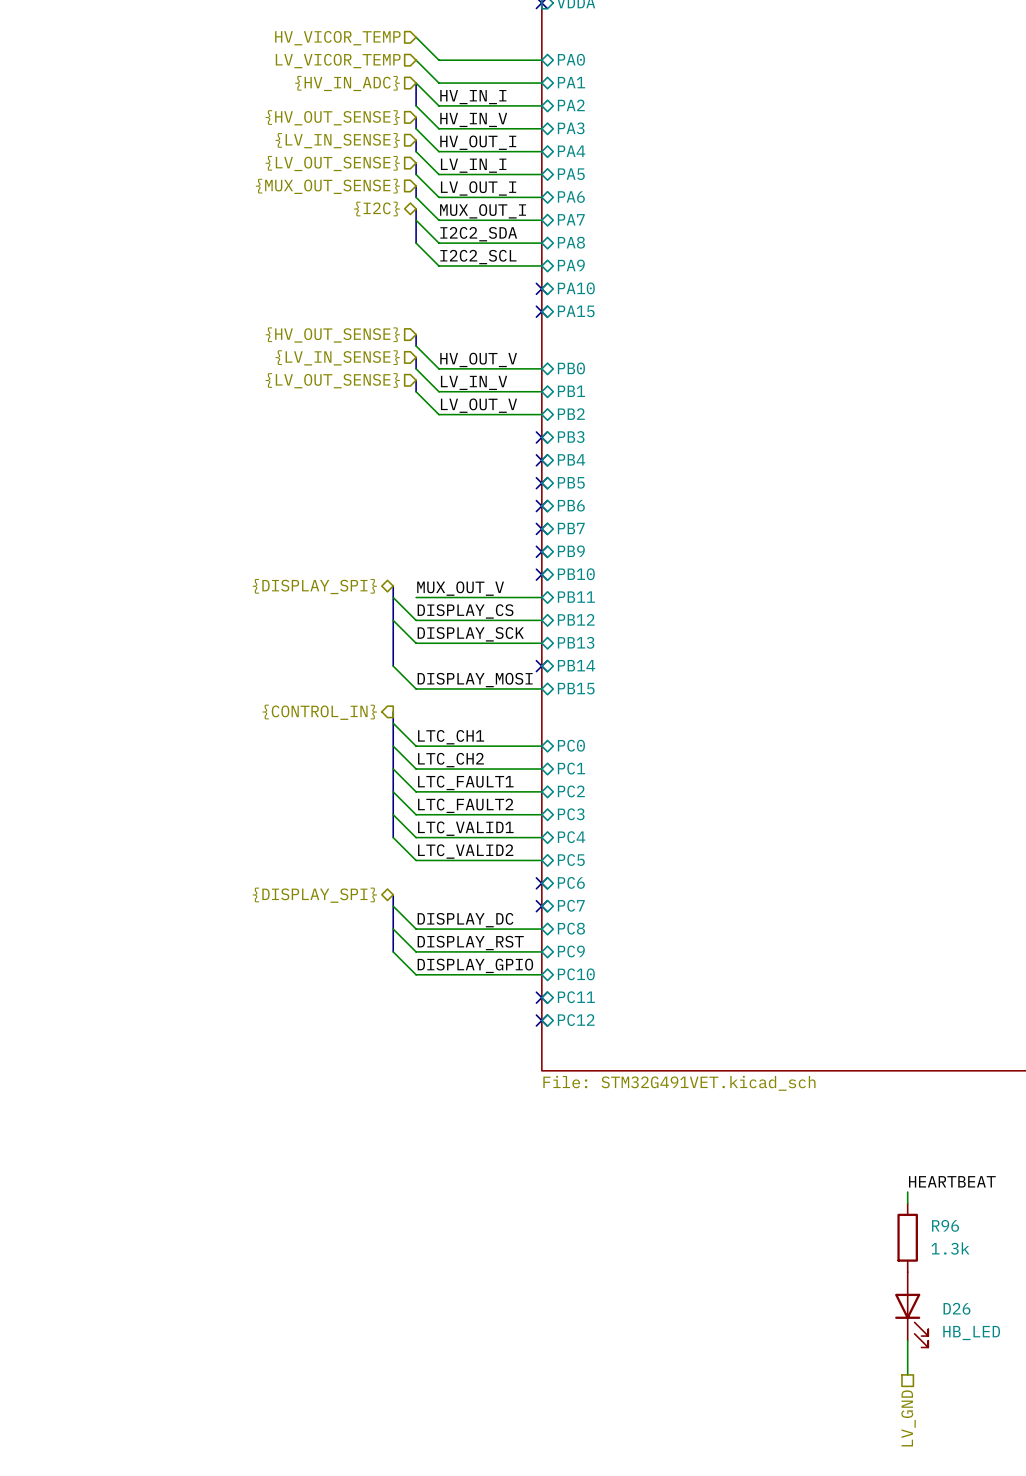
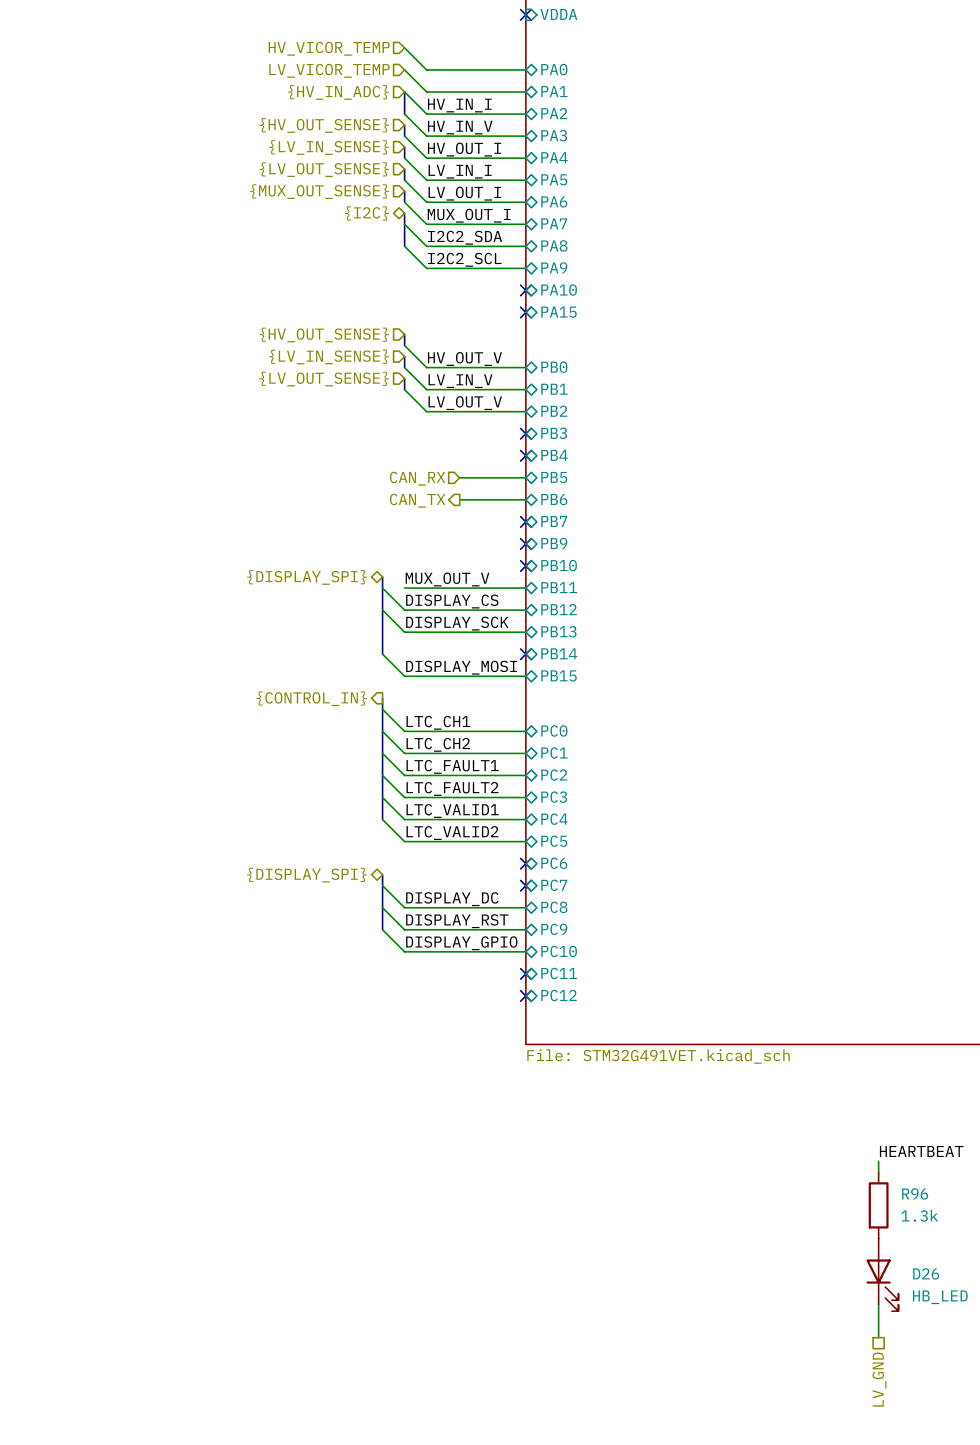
wire: none -> (459, 477) (525, 477)
no-connect mark: (541, 483) -> none
hierarchical label: none -> CAN_RX (417, 478)
hierarchical label: none -> CAN_TX (417, 500)
wire: none -> (459, 499) (525, 499)
no-connect mark: (541, 506) -> none

